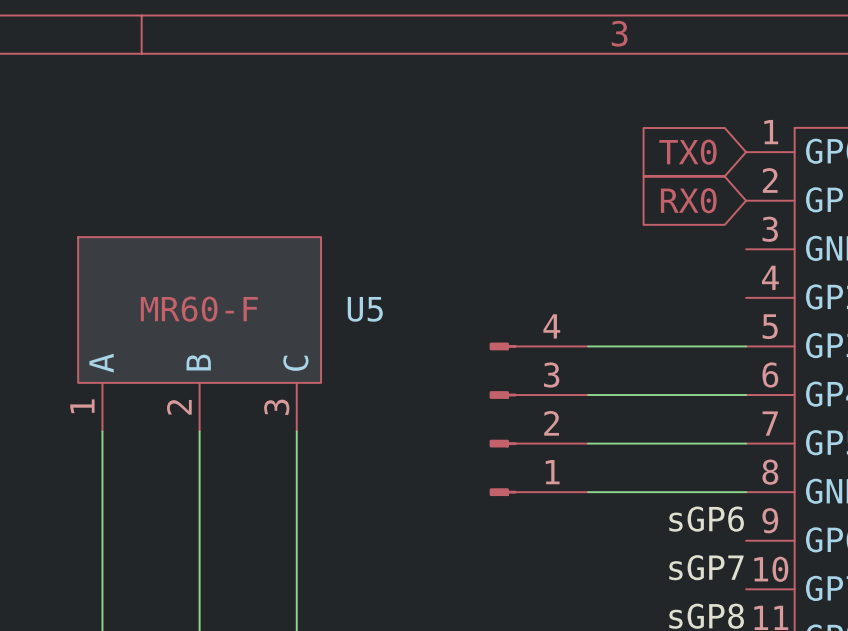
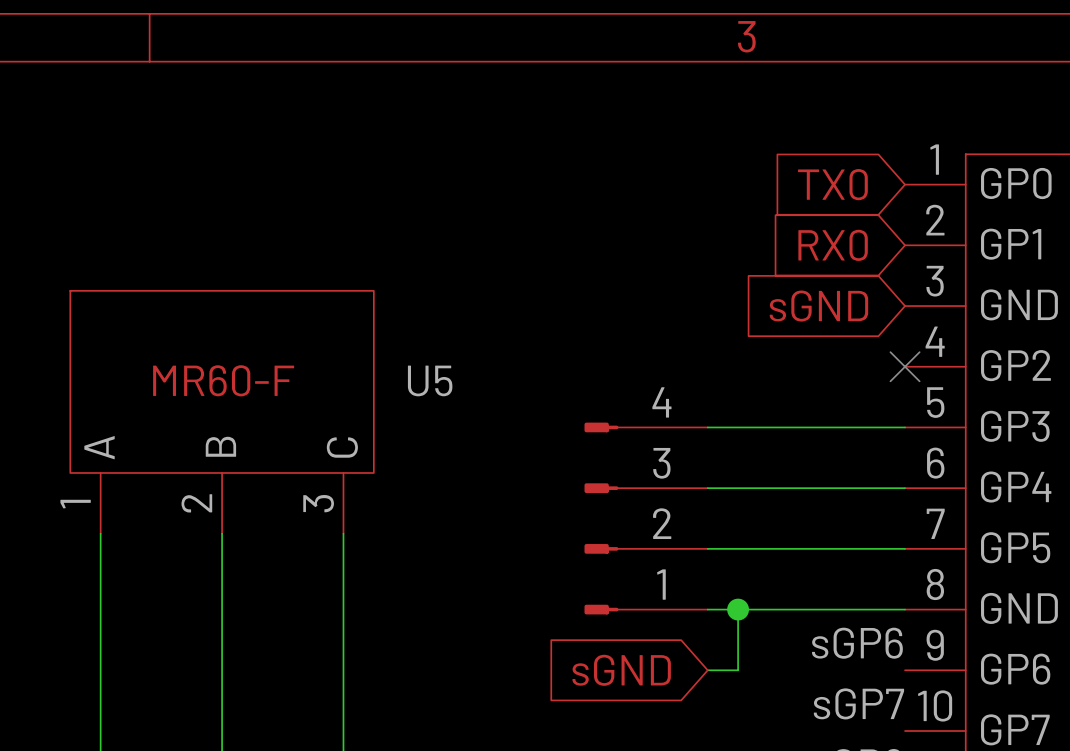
global label: none -> sGND (818, 306)
no-connect mark: none -> (905, 366)
wire: none -> (738, 609) (738, 670) (707, 670)
junction: none -> (738, 609)
global label: none -> sGND (621, 670)

